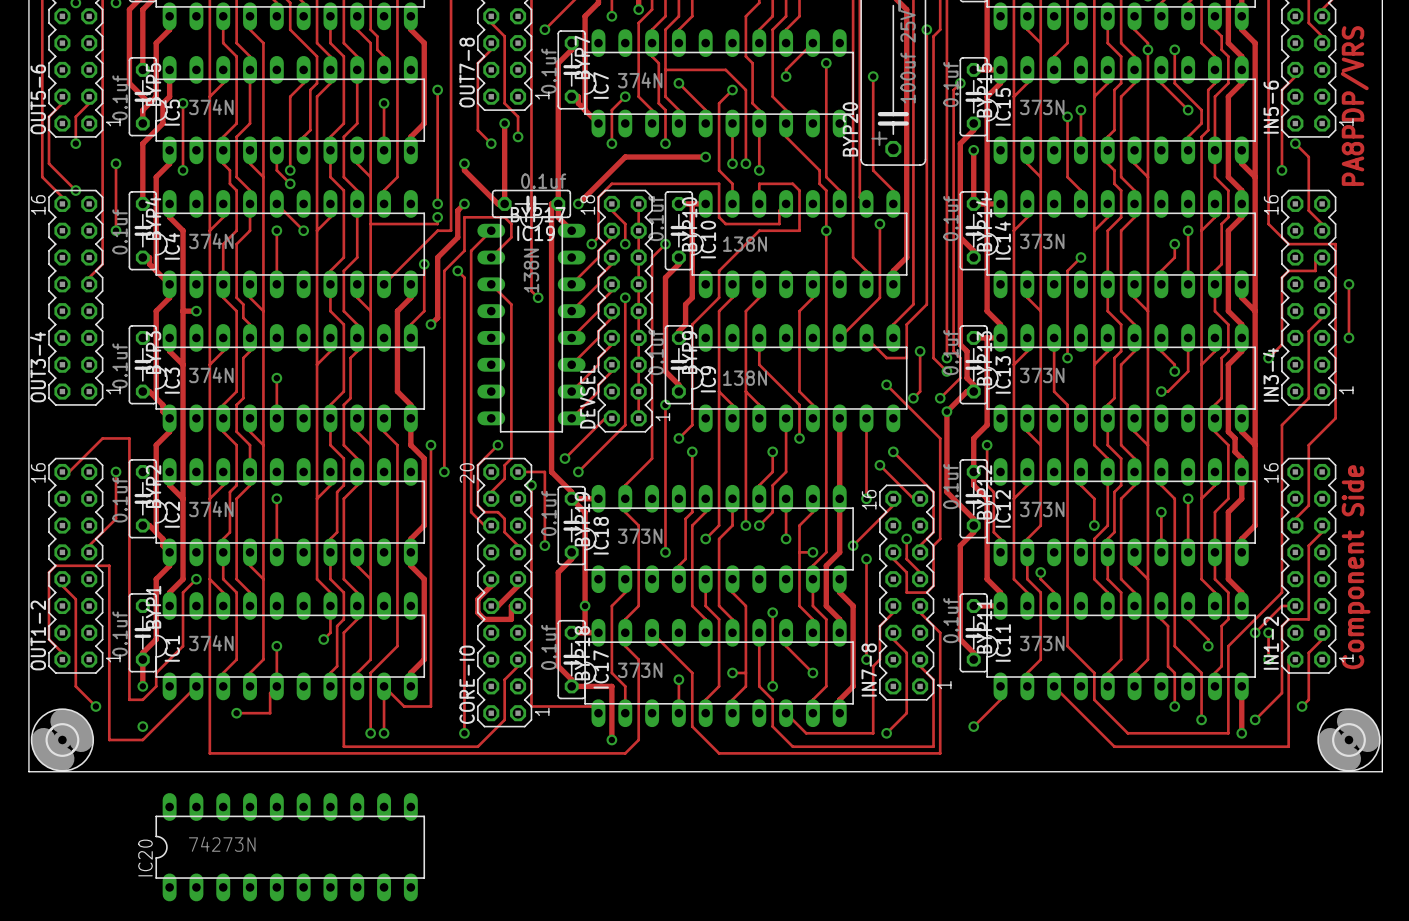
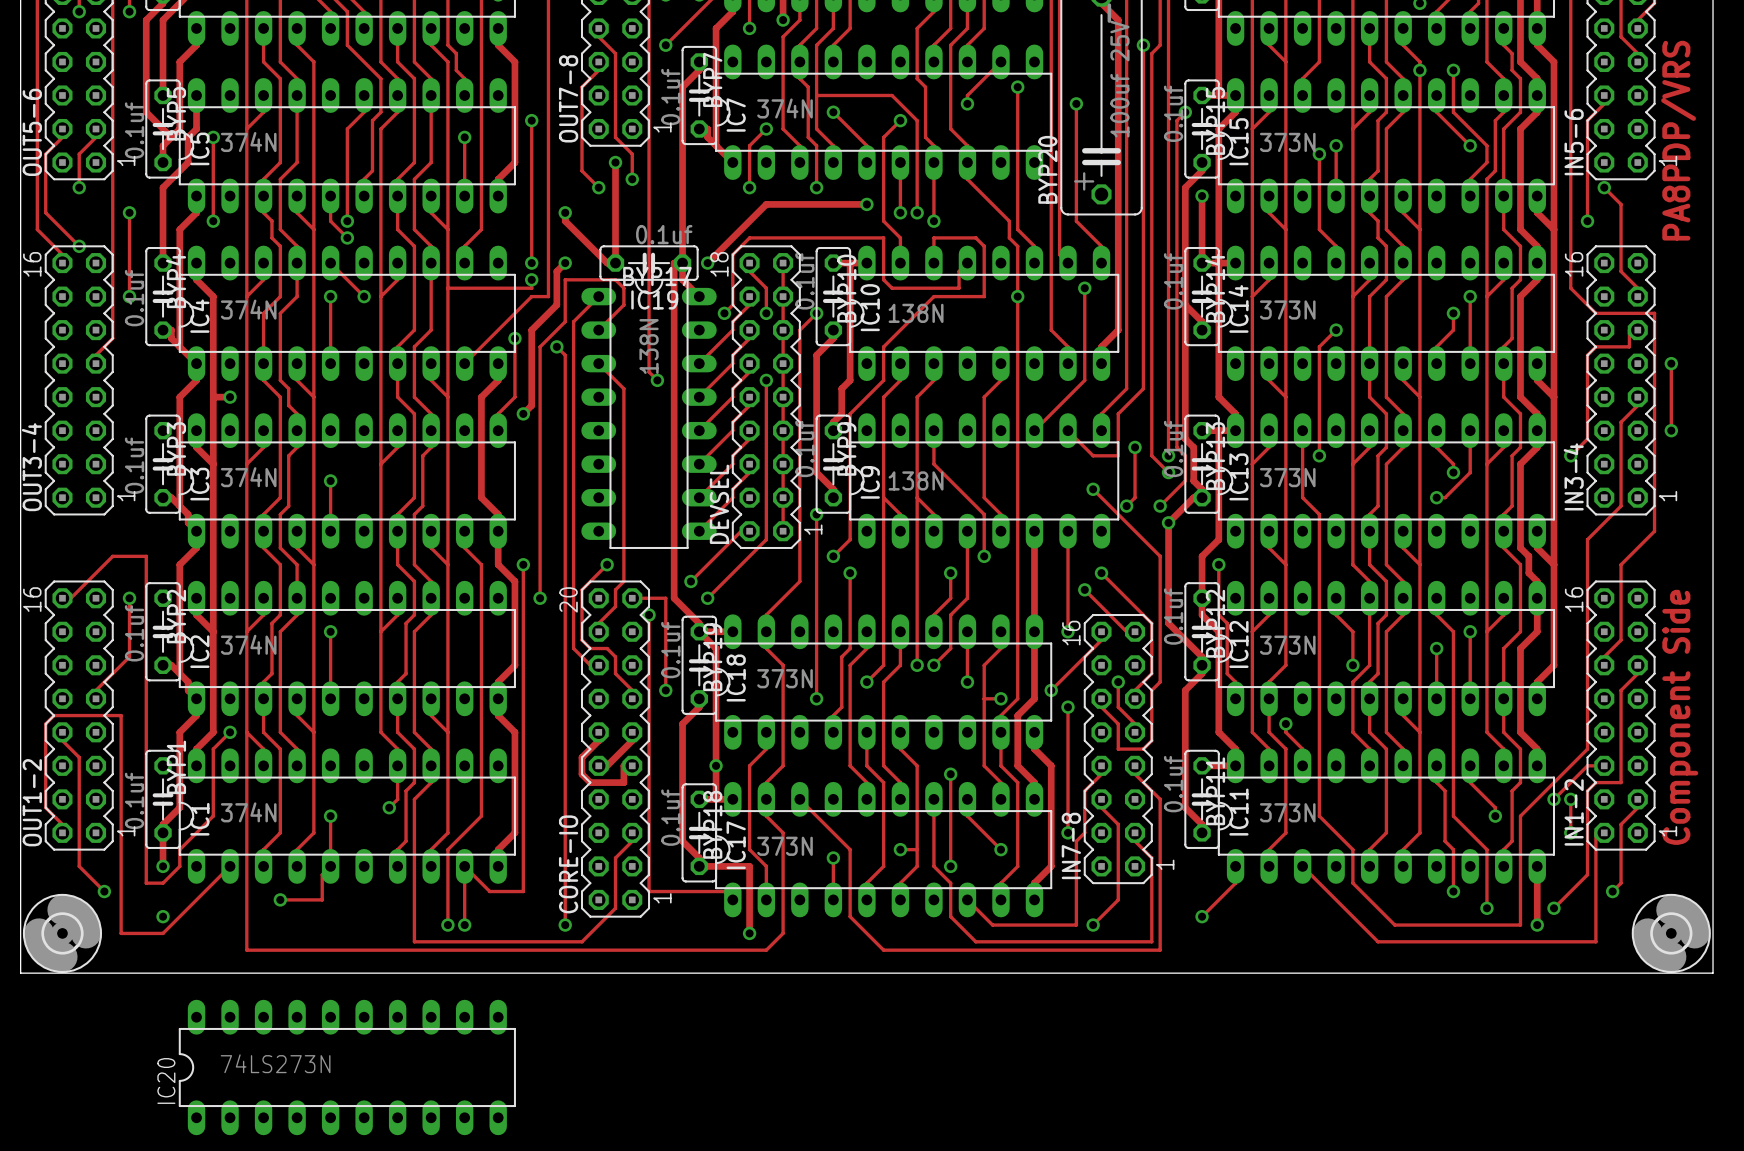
IC20 value: 74273N (222, 844) -> 74LS273N (275, 1063)

